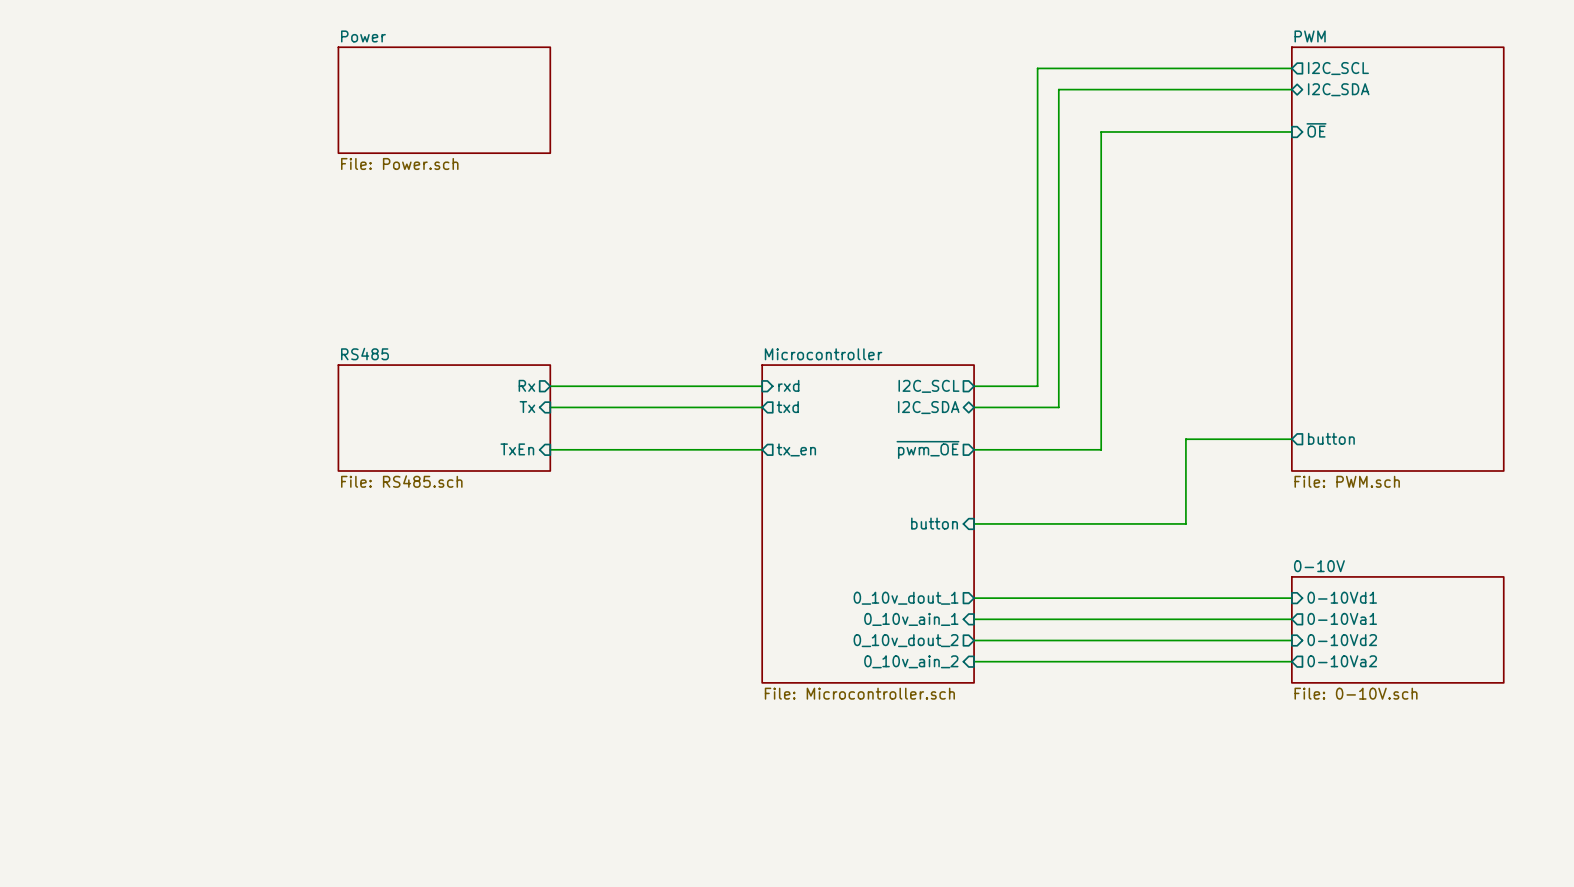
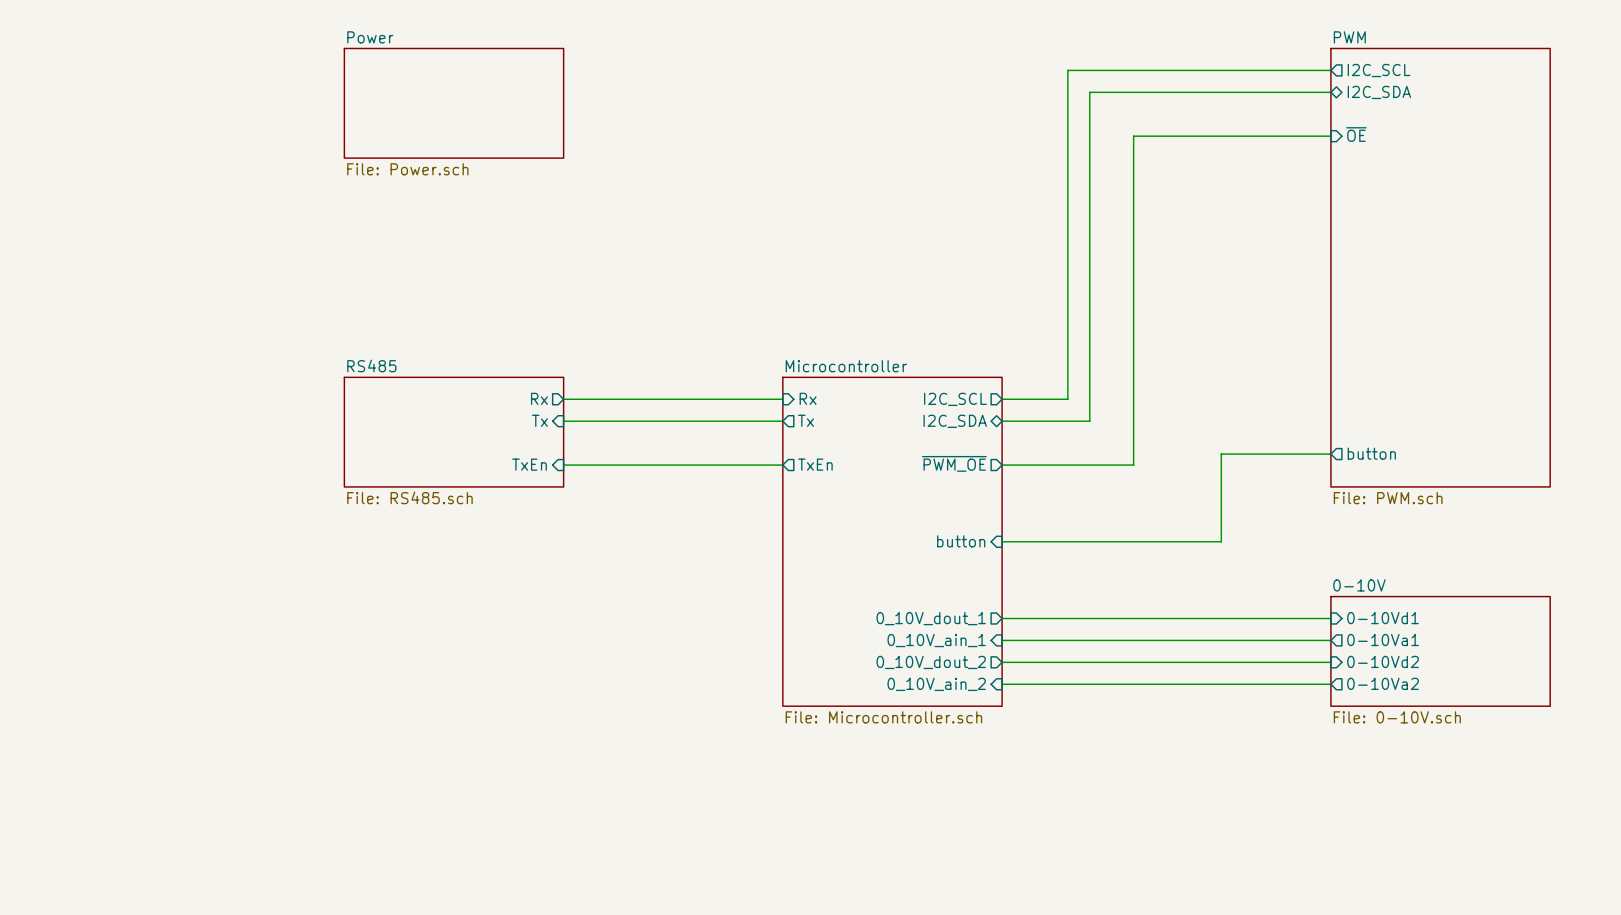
sheet pin: rxd (788, 385) -> Rx (808, 398)
sheet pin: txd (787, 407) -> Tx (805, 420)
sheet pin: tx_en (796, 449) -> TxEn (815, 464)
sheet pin: ~{pwm_OE} (927, 449) -> ~{PWM_OE} (954, 463)
sheet pin: 0_10v_dout_1 (906, 598) -> 0_10V_dout_1 (931, 618)
sheet pin: 0_10v_ain_1 (911, 619) -> 0_10V_ain_1 (936, 640)
sheet pin: 0_10v_dout_2 (906, 640) -> 0_10V_dout_2 (931, 662)
sheet pin: 0_10v_ain_2 (911, 661) -> 0_10V_ain_2 (936, 684)

